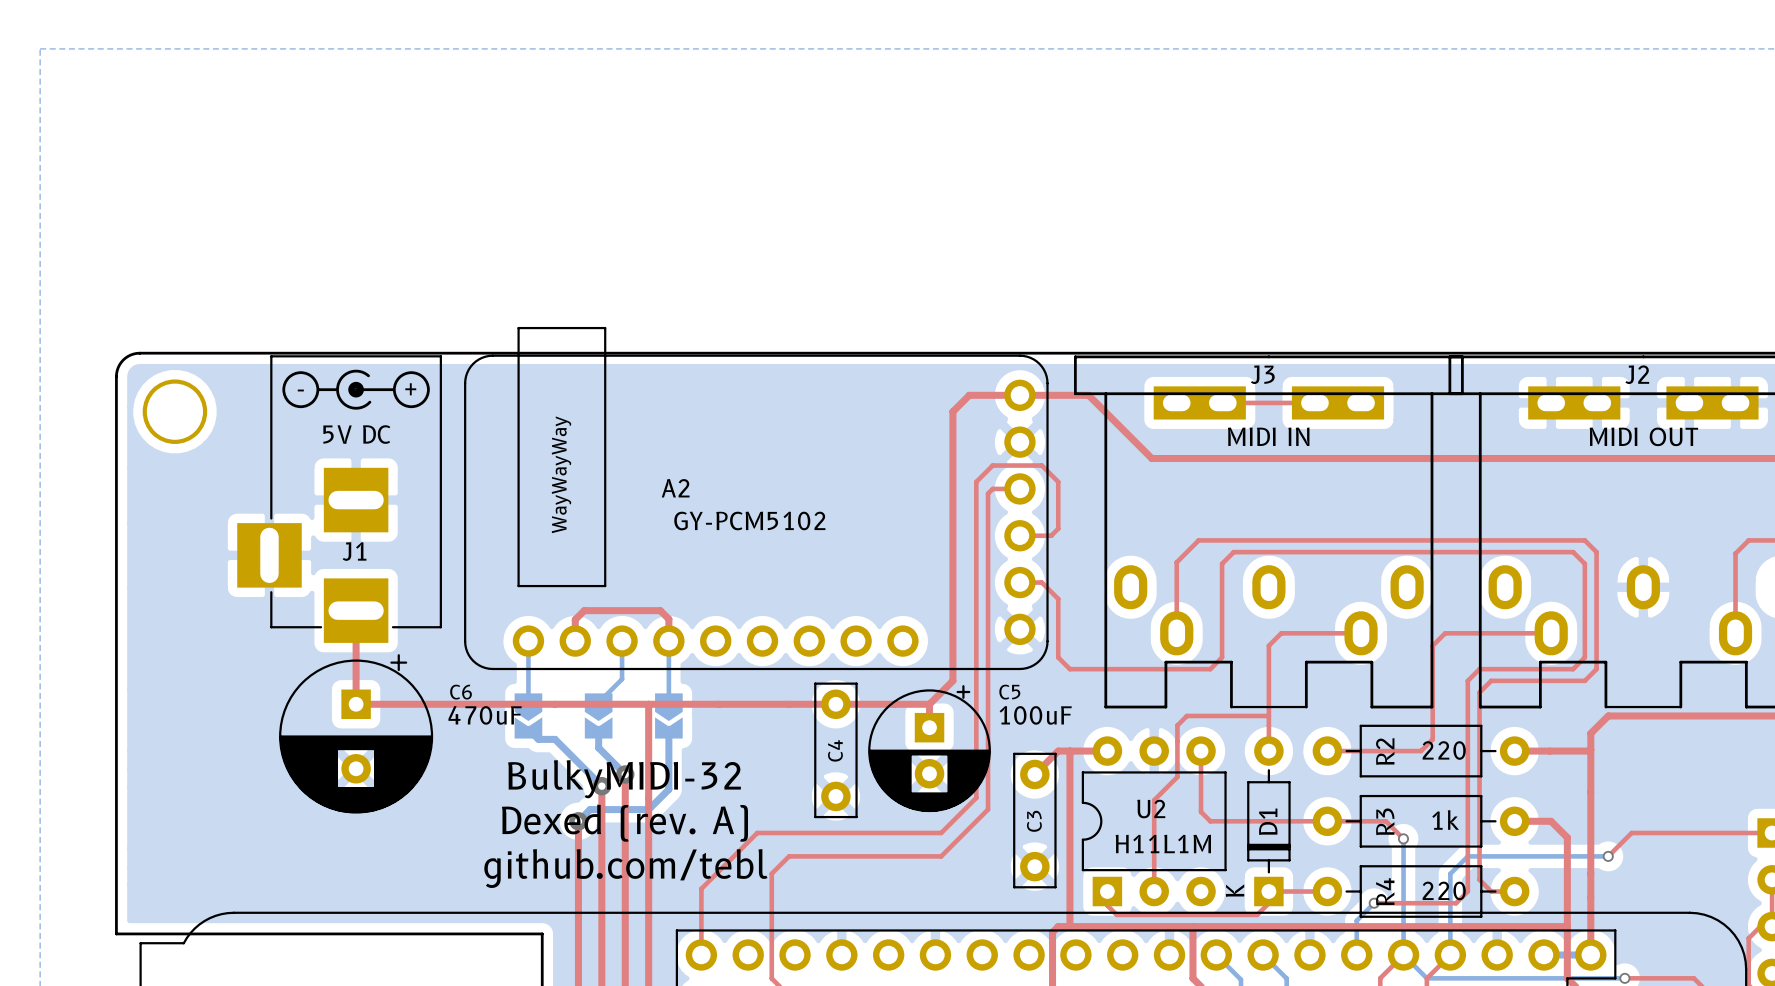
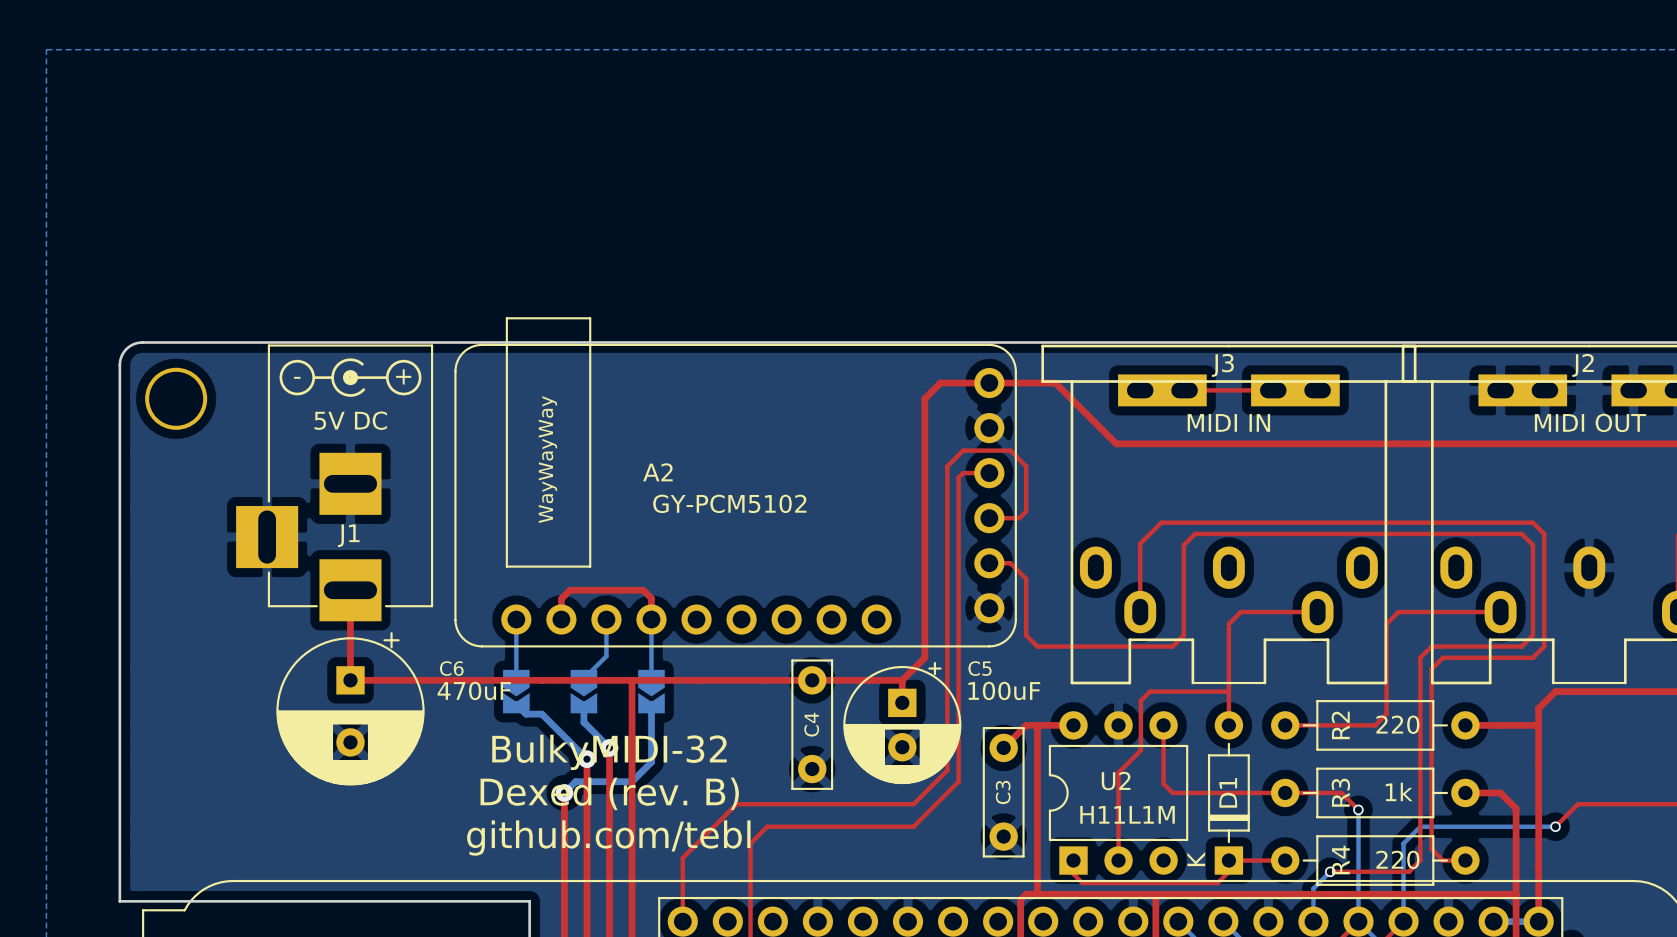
text: Dexed (rev. A) (624, 823) -> Dexed (rev. B) (609, 793)

